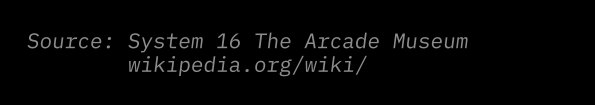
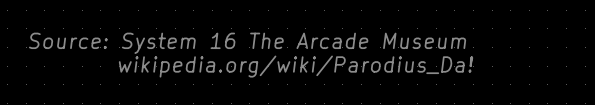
text: wikipedia.org/wiki/ (247, 66) -> wikipedia.org/wiki/Parodius_Da! (296, 66)

